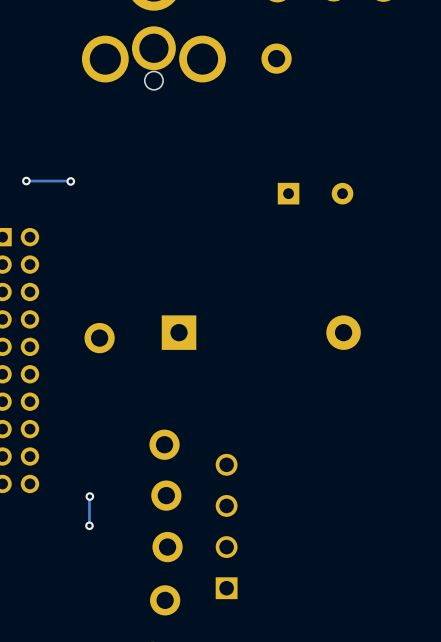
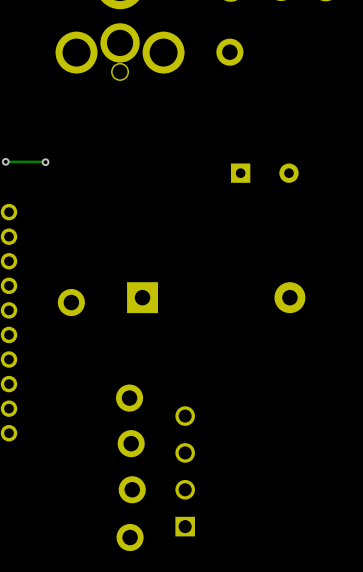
track: (89, 496) (89, 525) -> none
via: (89, 496) -> none
via: (89, 525) -> none

